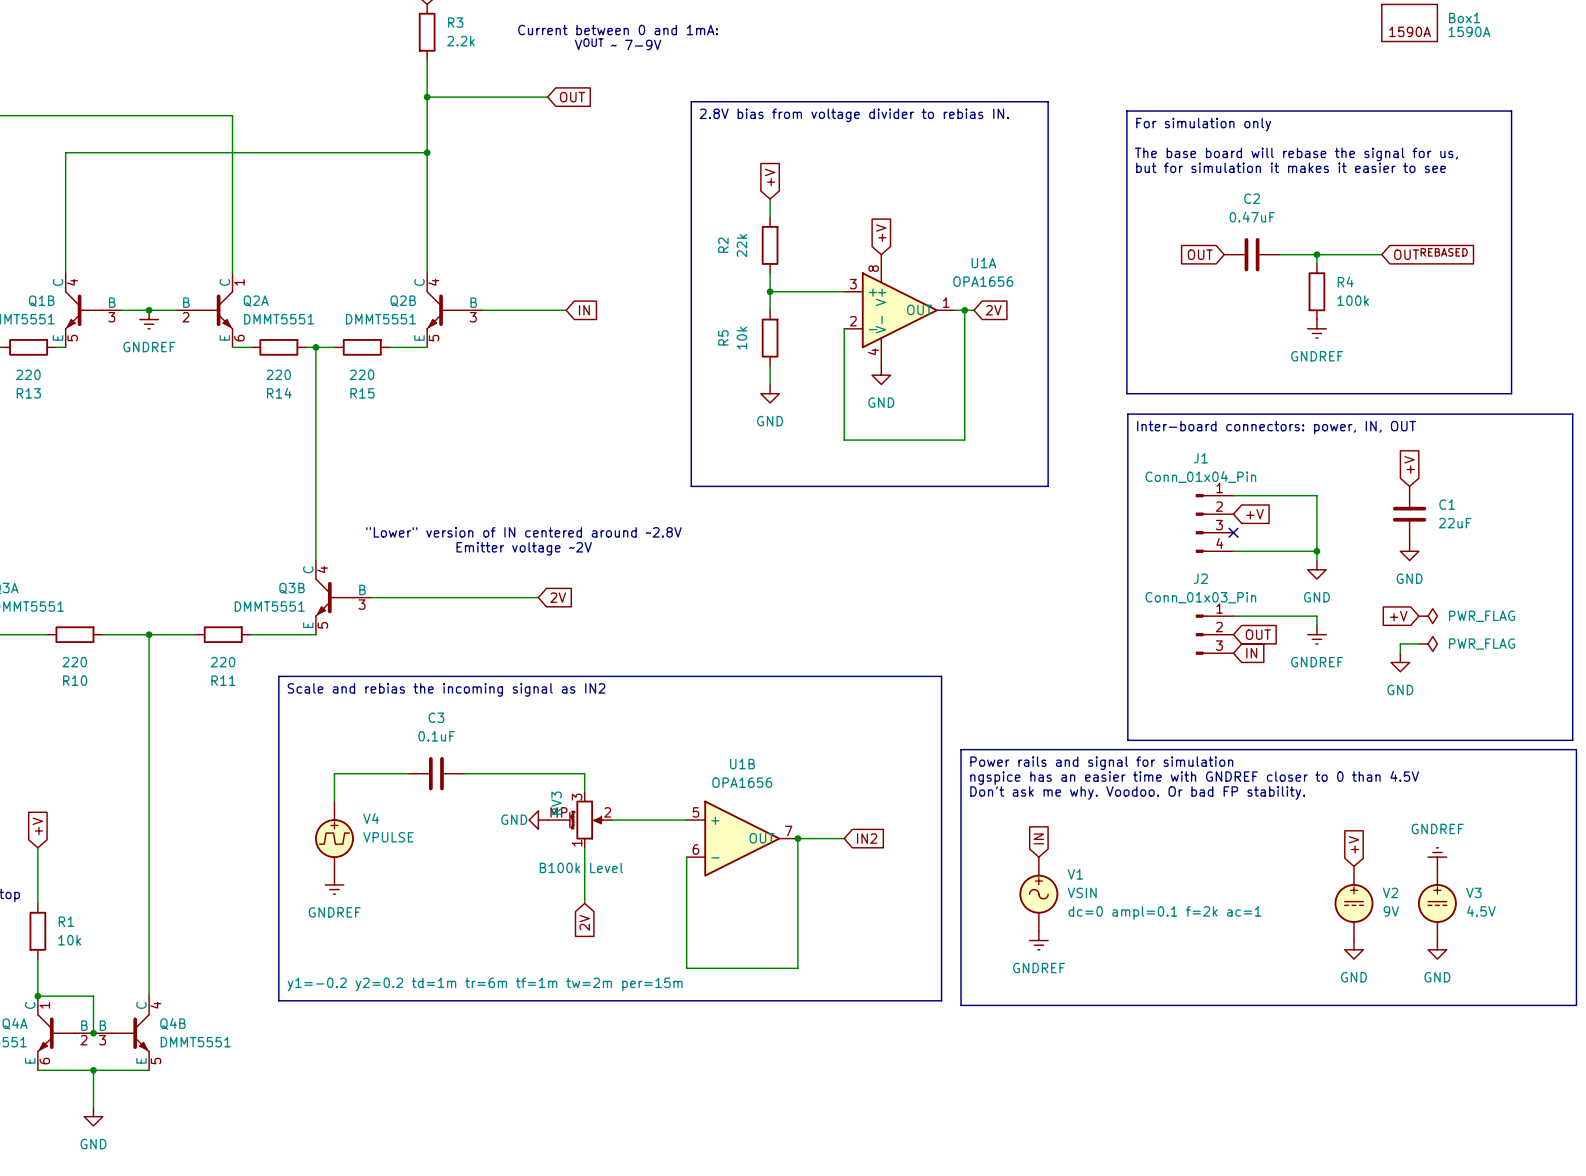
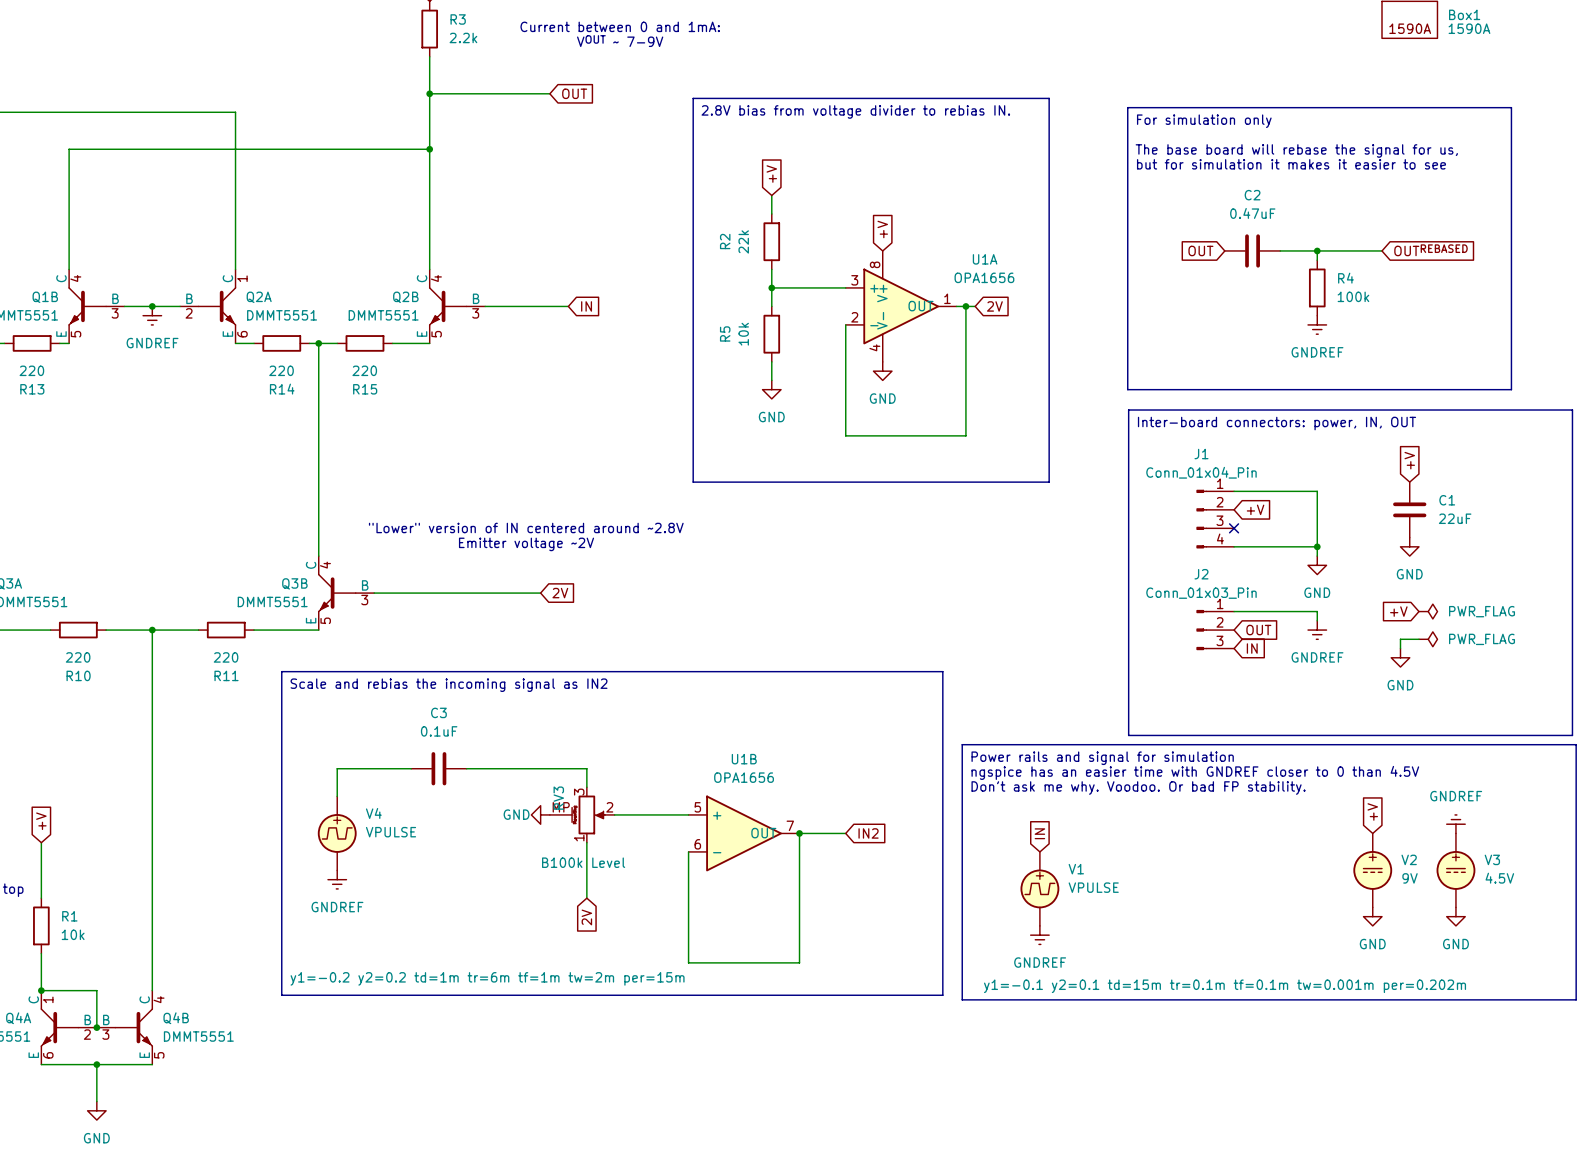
global label position: +V (1353, 844) -> +V (1372, 811)
V1 symbol: [1019, 857, 1059, 932] -> [1020, 851, 1060, 926]
power symbol position: GNDREF (1437, 857) -> GNDREF (1455, 824)
V1 value: VSIN (1082, 892) -> VPULSE (1093, 887)
V2 position: (1353, 903) -> (1372, 870)
V3 position: (1437, 903) -> (1455, 870)
V1 text: dc=0 ampl=0.1 f=2k ac=1 (1164, 912) -> y1=-0.1 y2=0.1 td=15m tr=0.1m tf=0.1m tw=0.001m per=0.202m (1225, 986)
power symbol position: GND (1353, 949) -> GND (1372, 916)
power symbol position: GND (1437, 949) -> GND (1455, 916)

